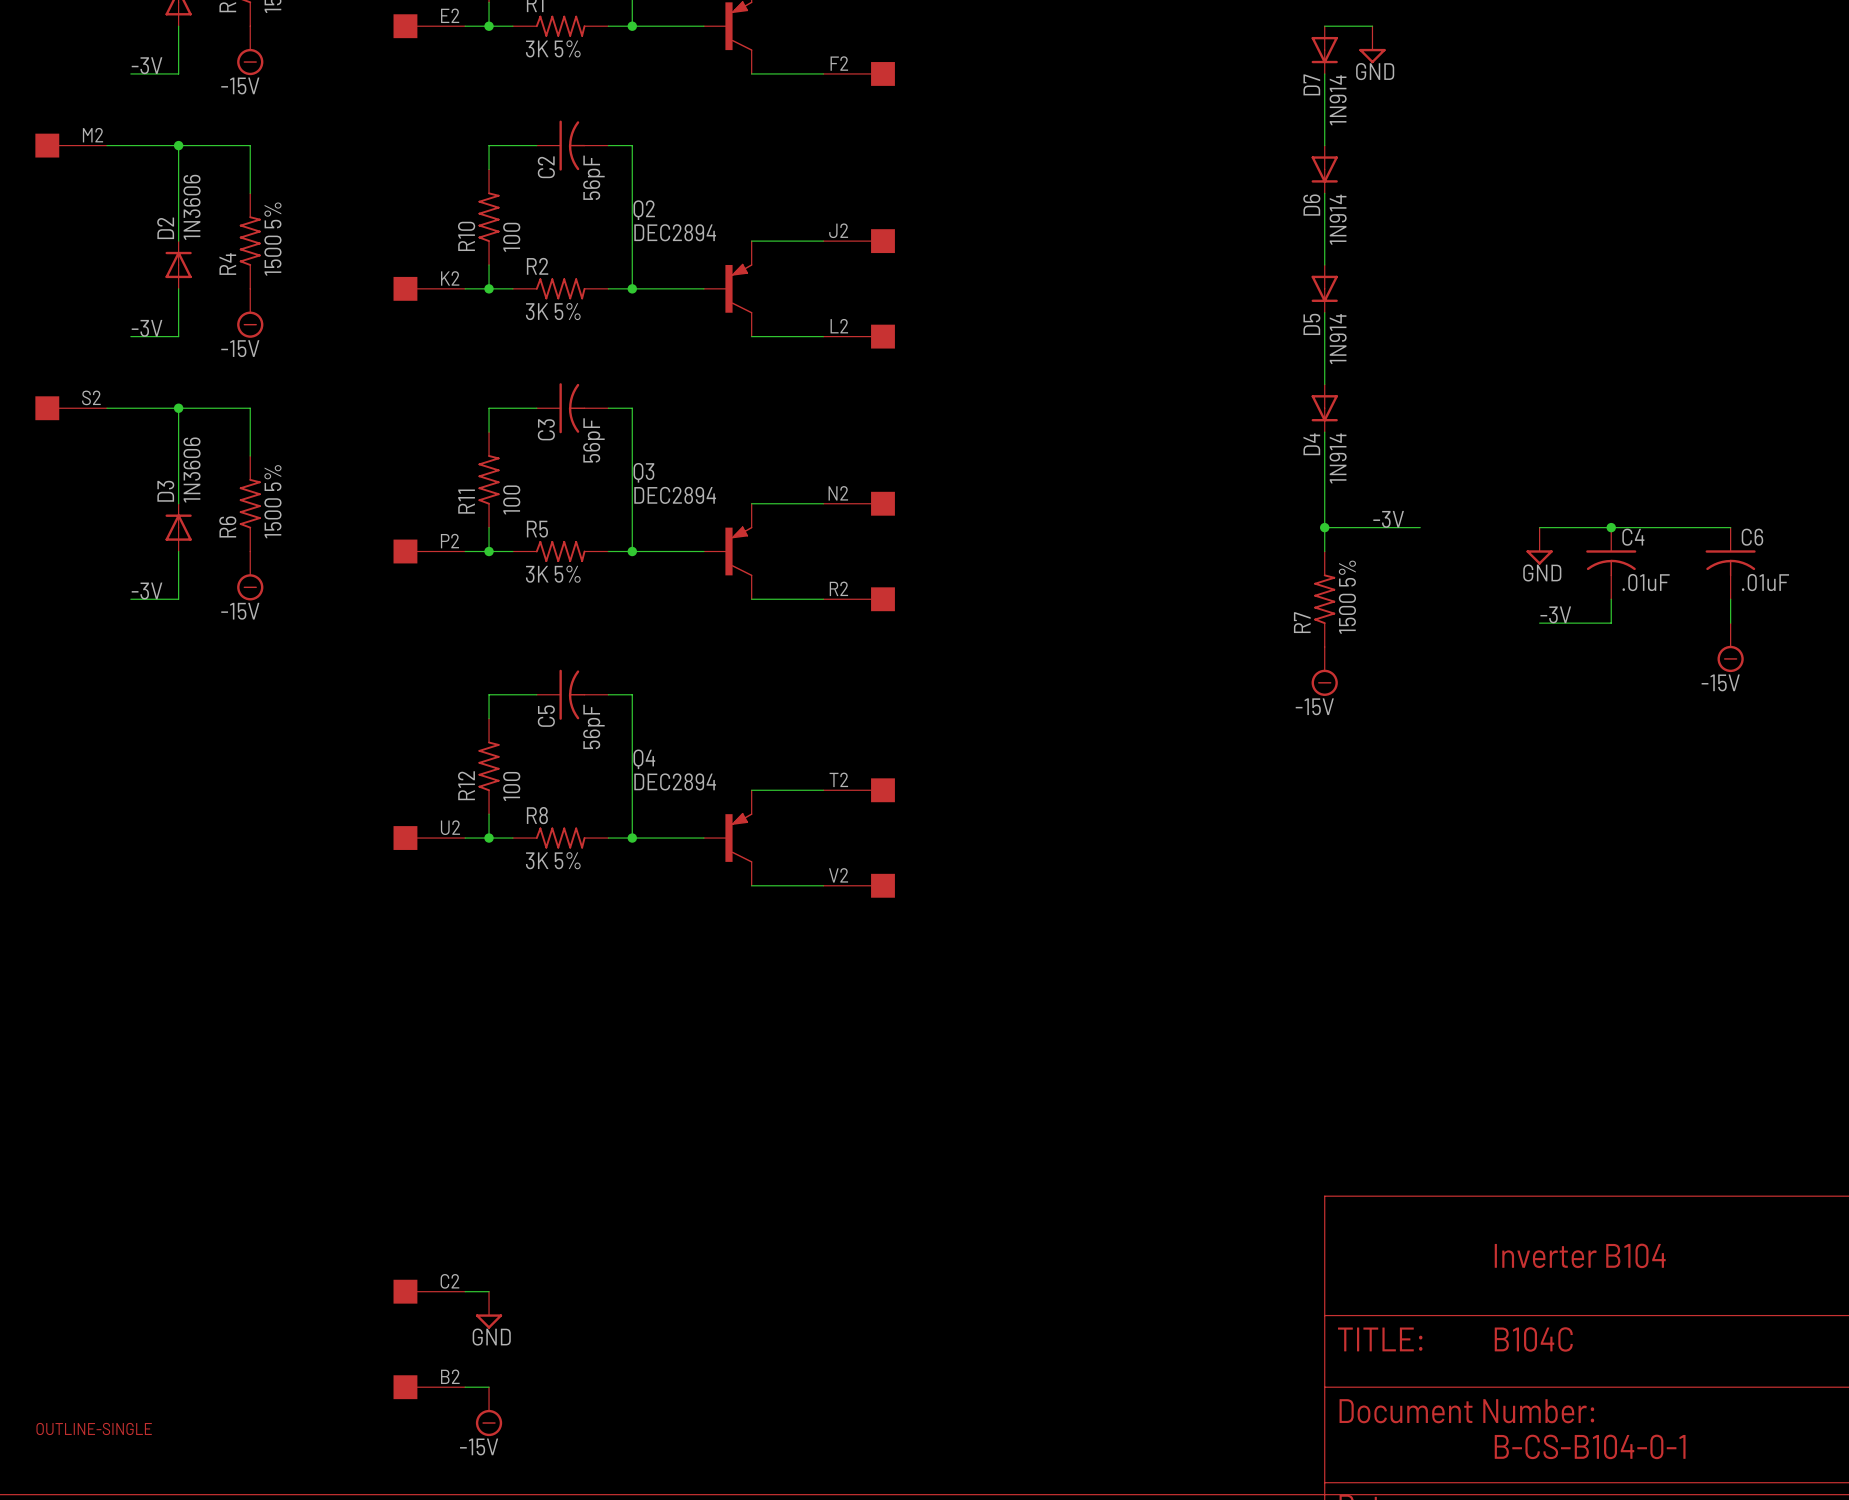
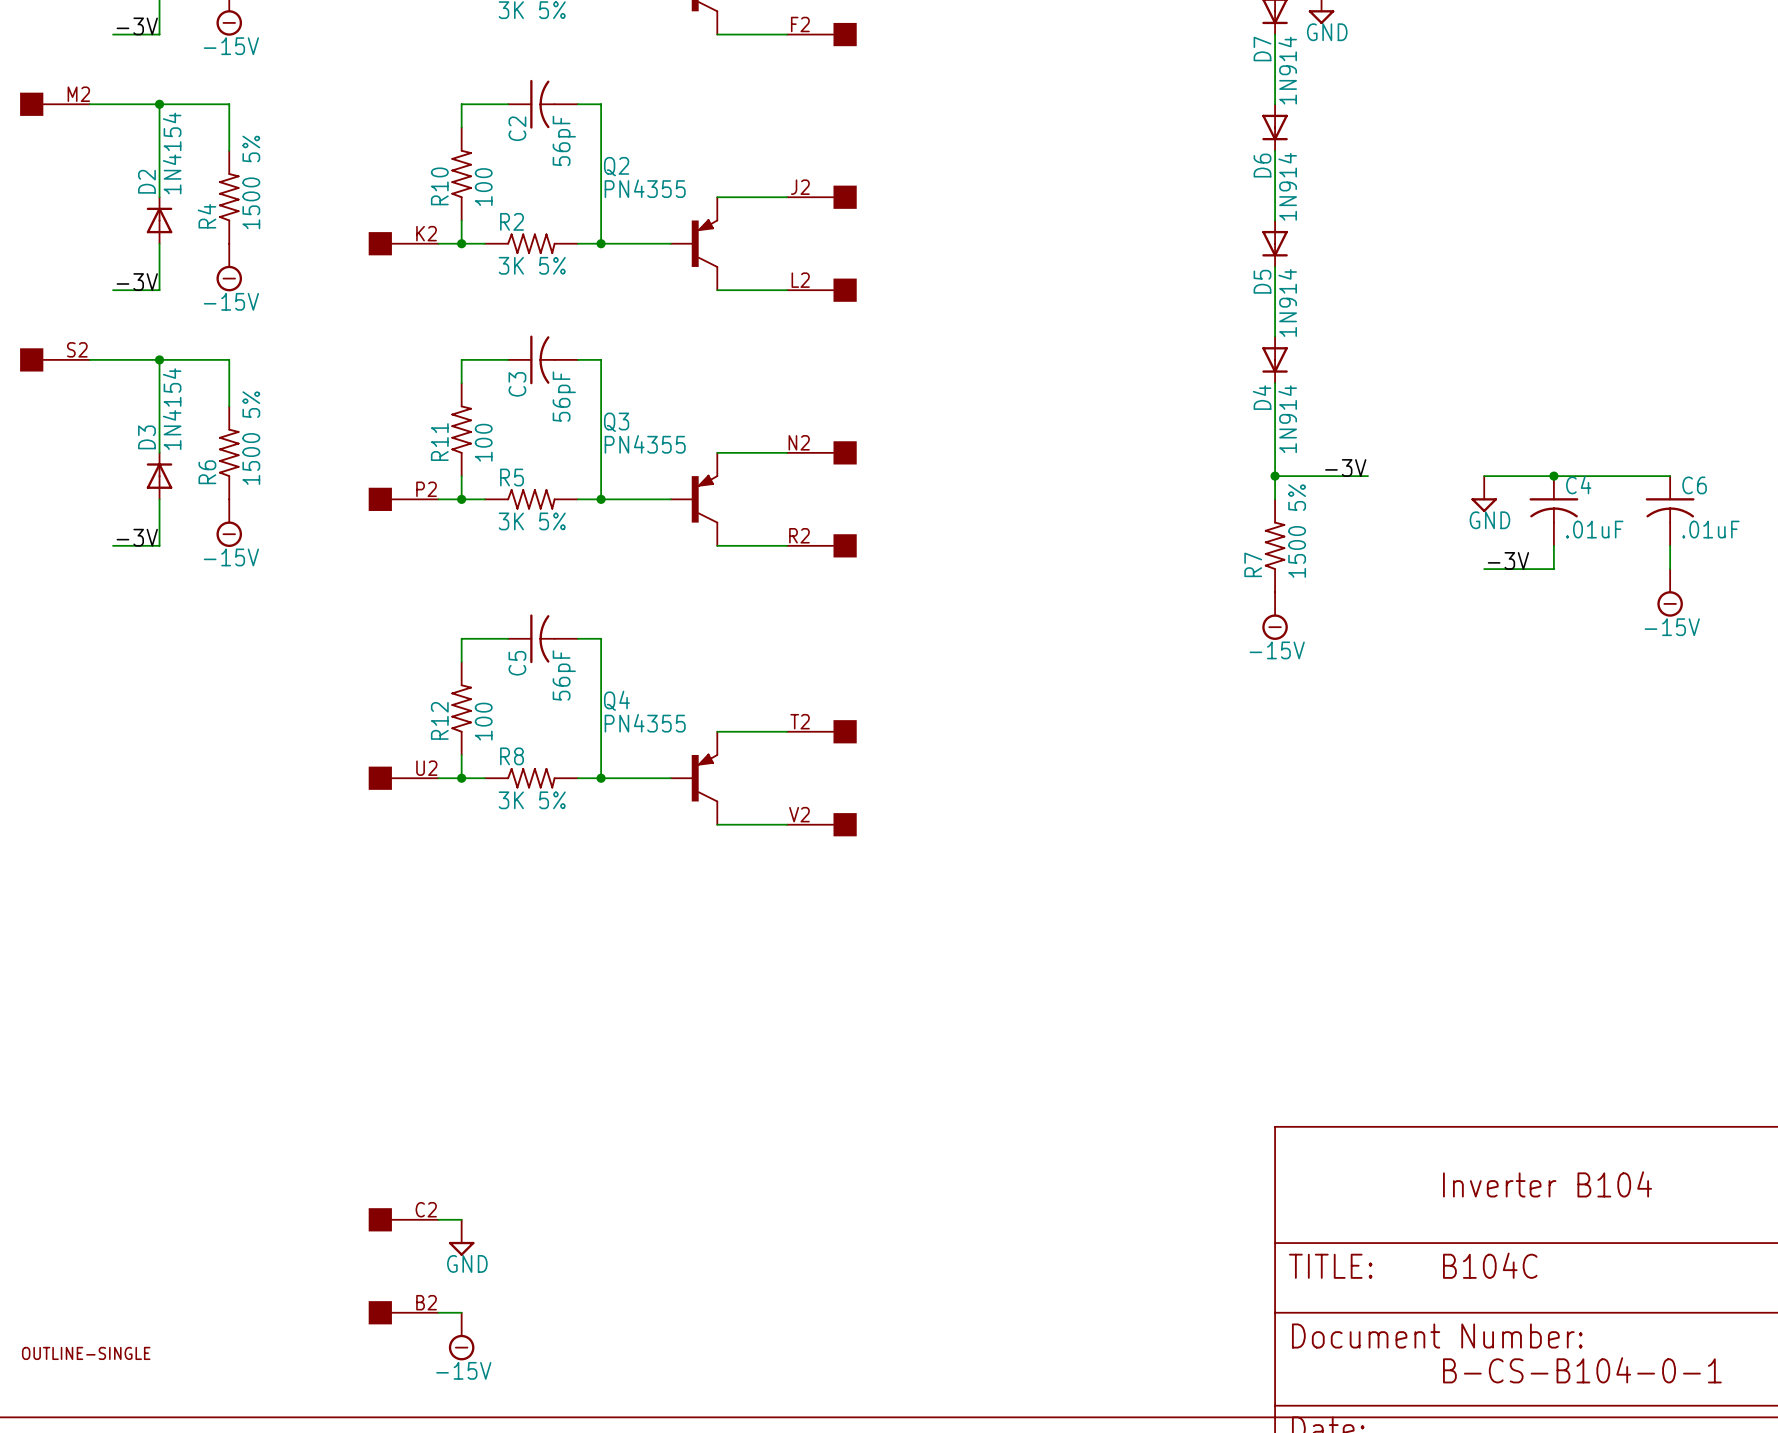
D2 value: 1N3606 (192, 207) -> 1N4154 (172, 153)
Q2 value: DEC2894 (675, 232) -> PN4355 (645, 188)
D3 value: 1N3606 (192, 469) -> 1N4154 (172, 409)
Q3 value: DEC2894 (675, 495) -> PN4355 (645, 444)
Q4 value: DEC2894 (675, 781) -> PN4355 (645, 723)

